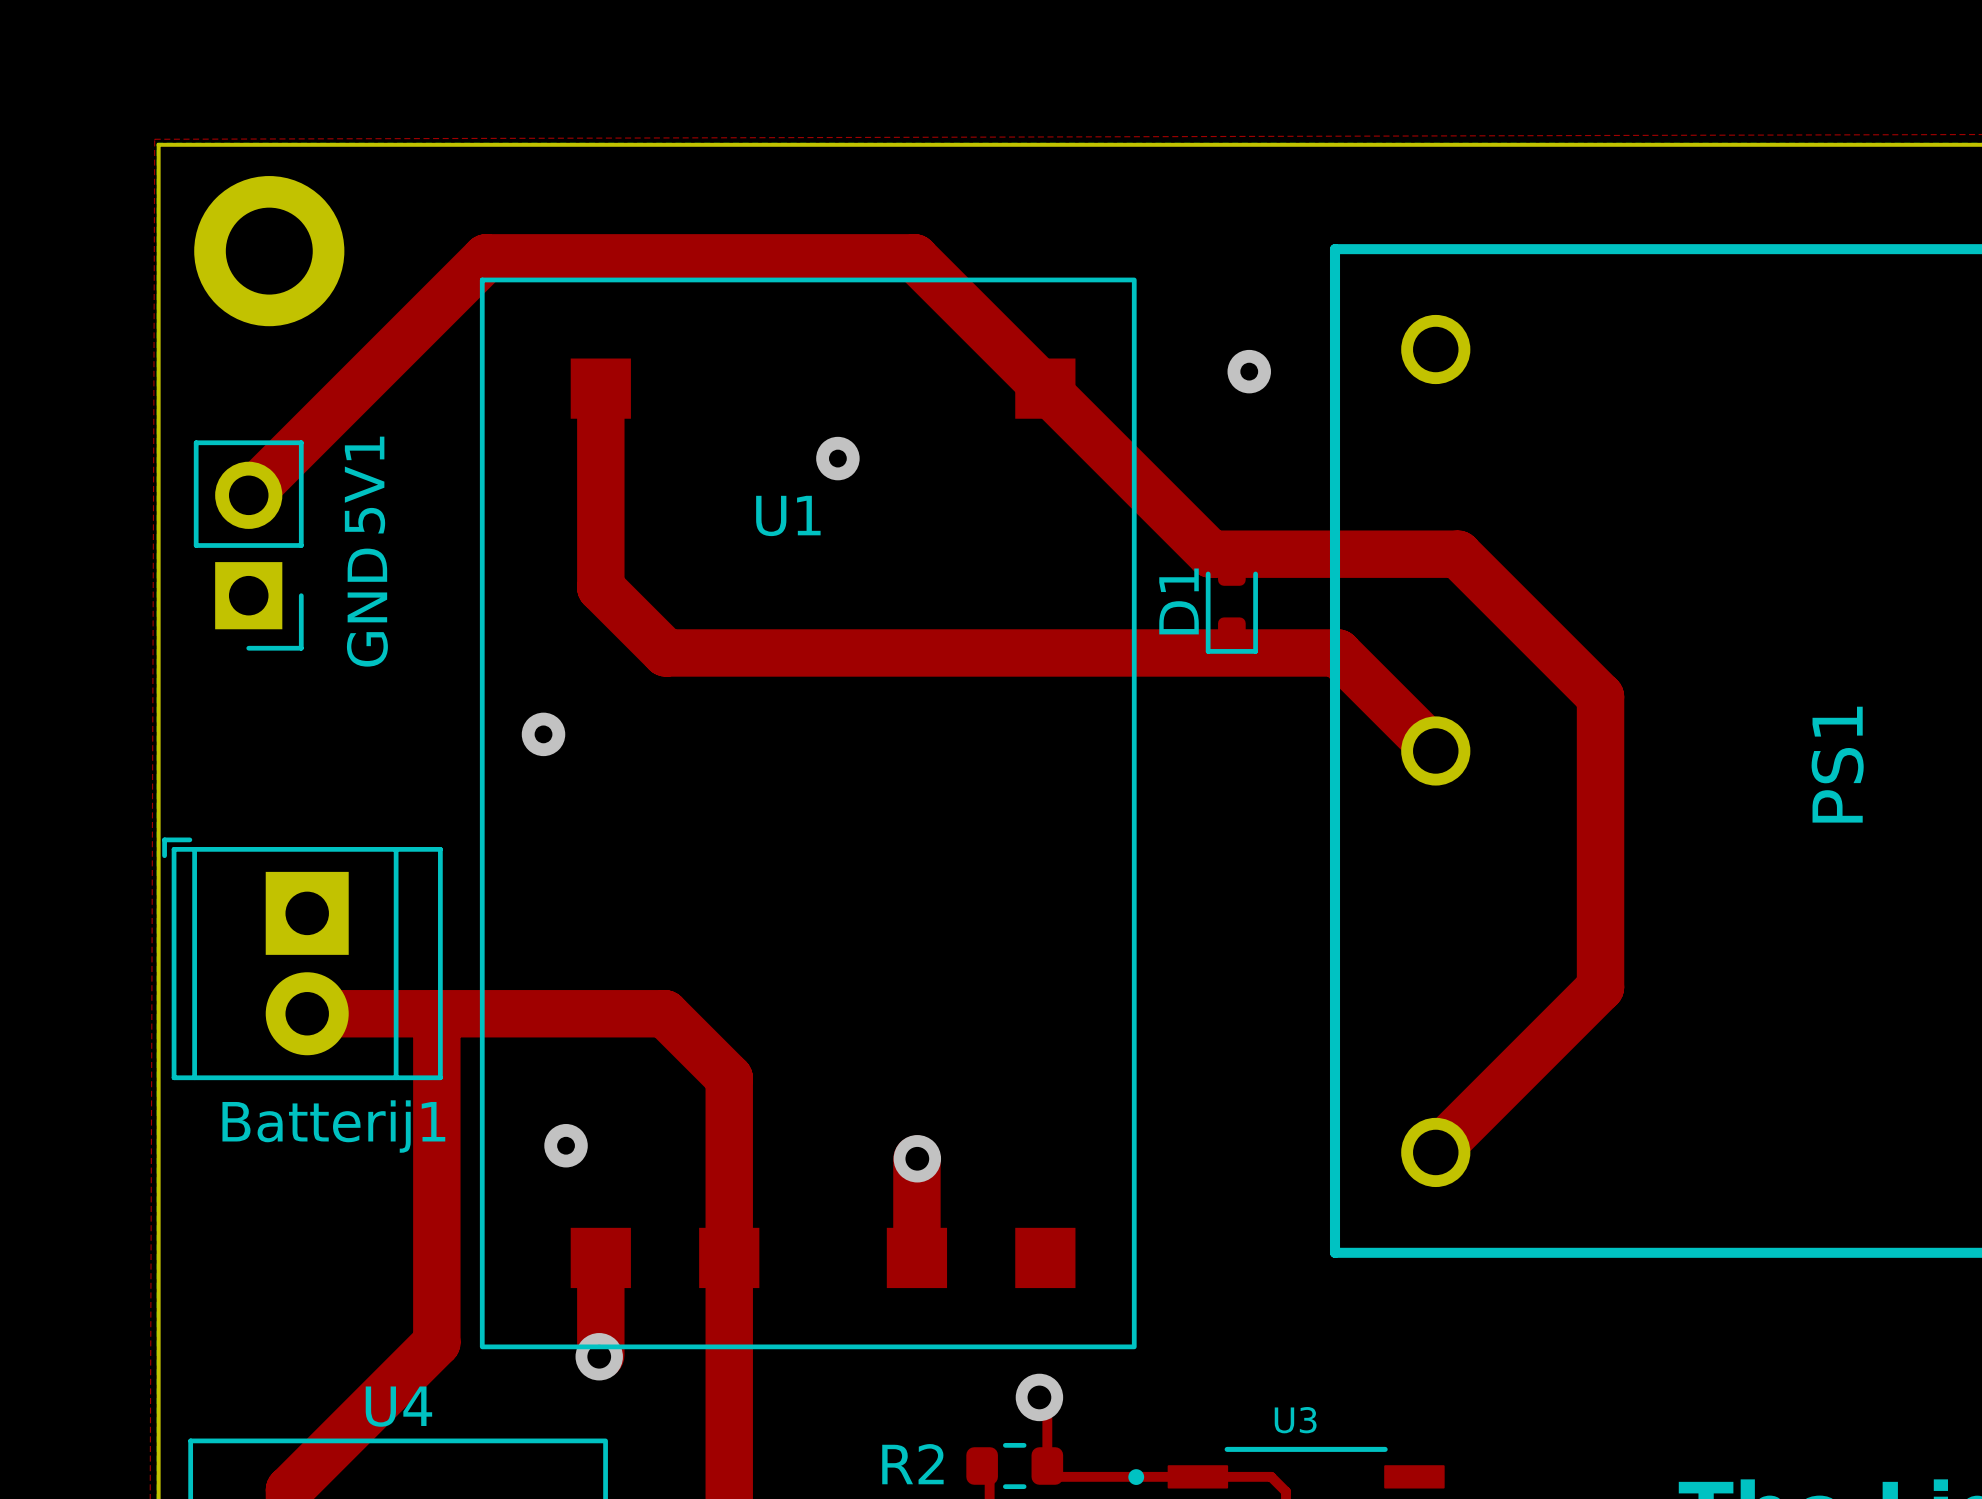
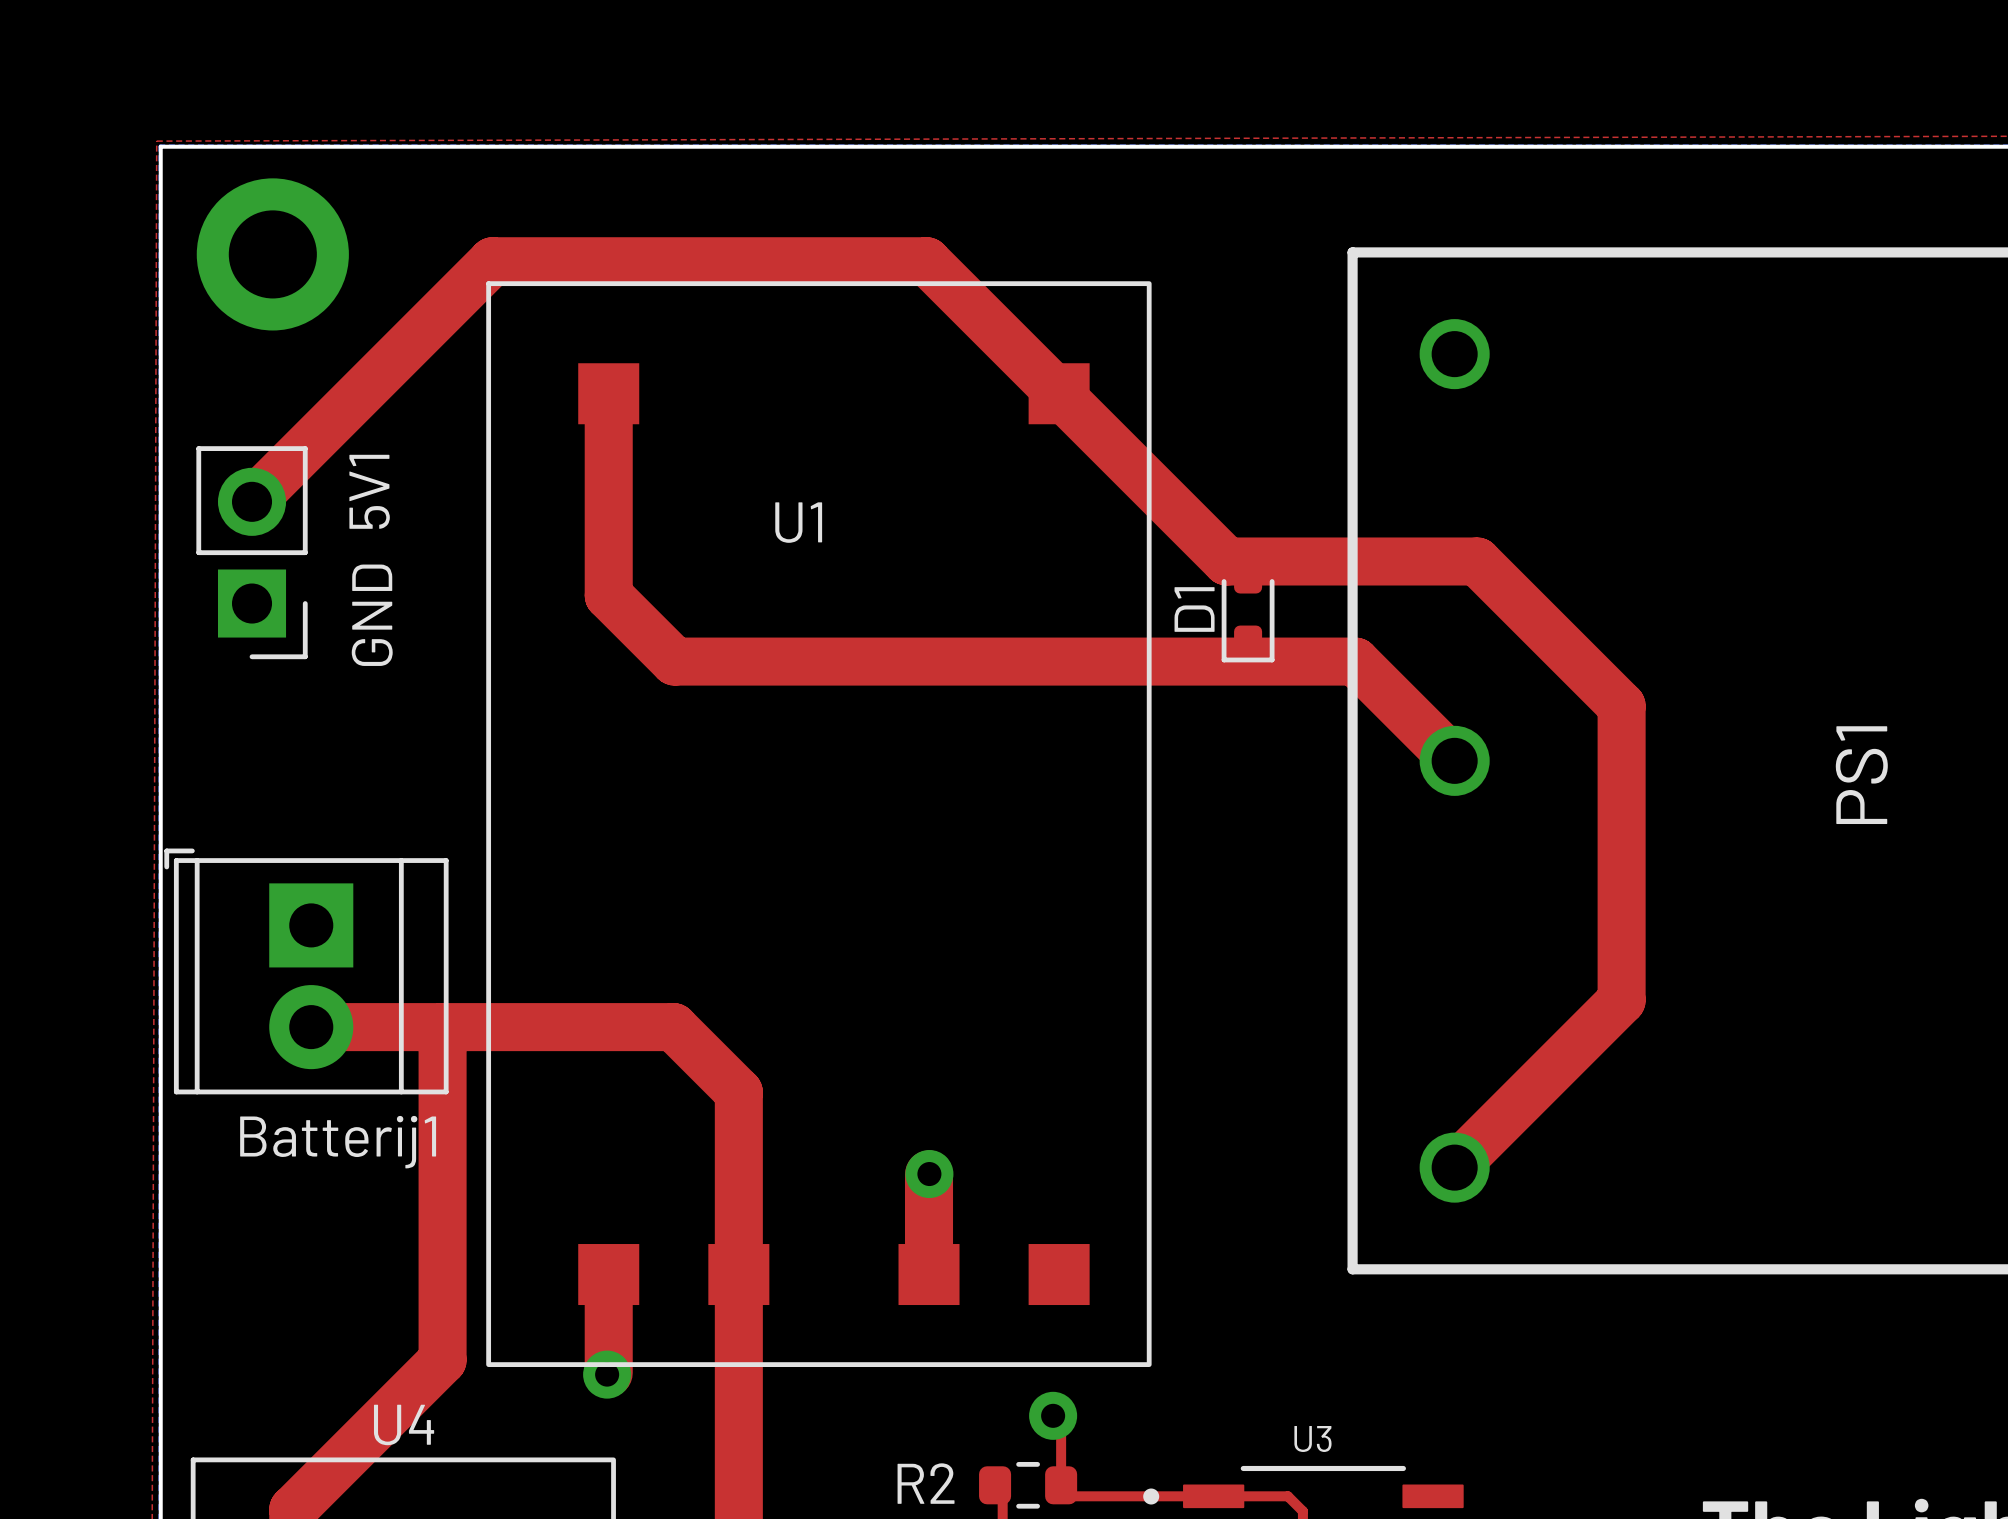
via: (1249, 371) -> none
via: (837, 458) -> none
via: (543, 734) -> none
via: (566, 1145) -> none

